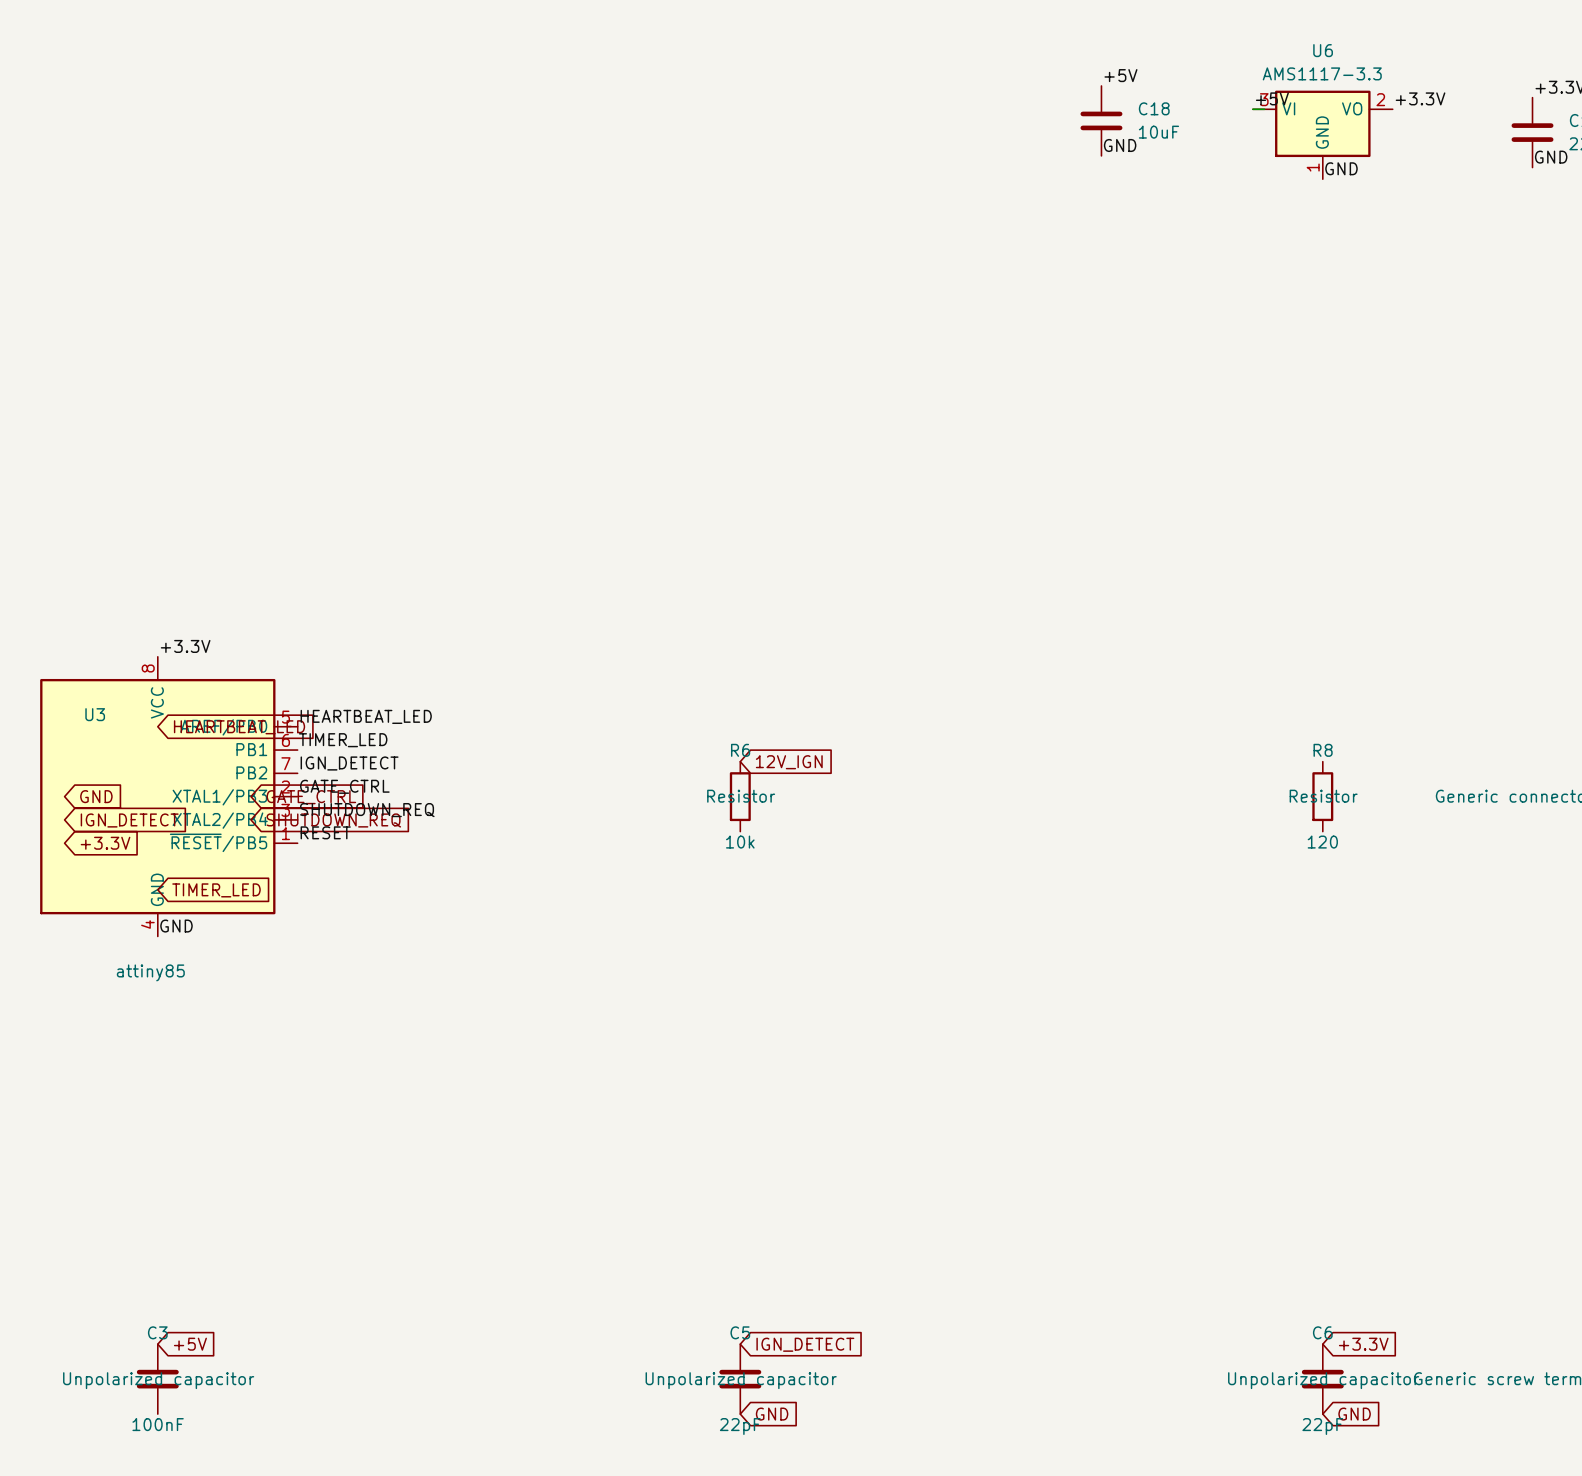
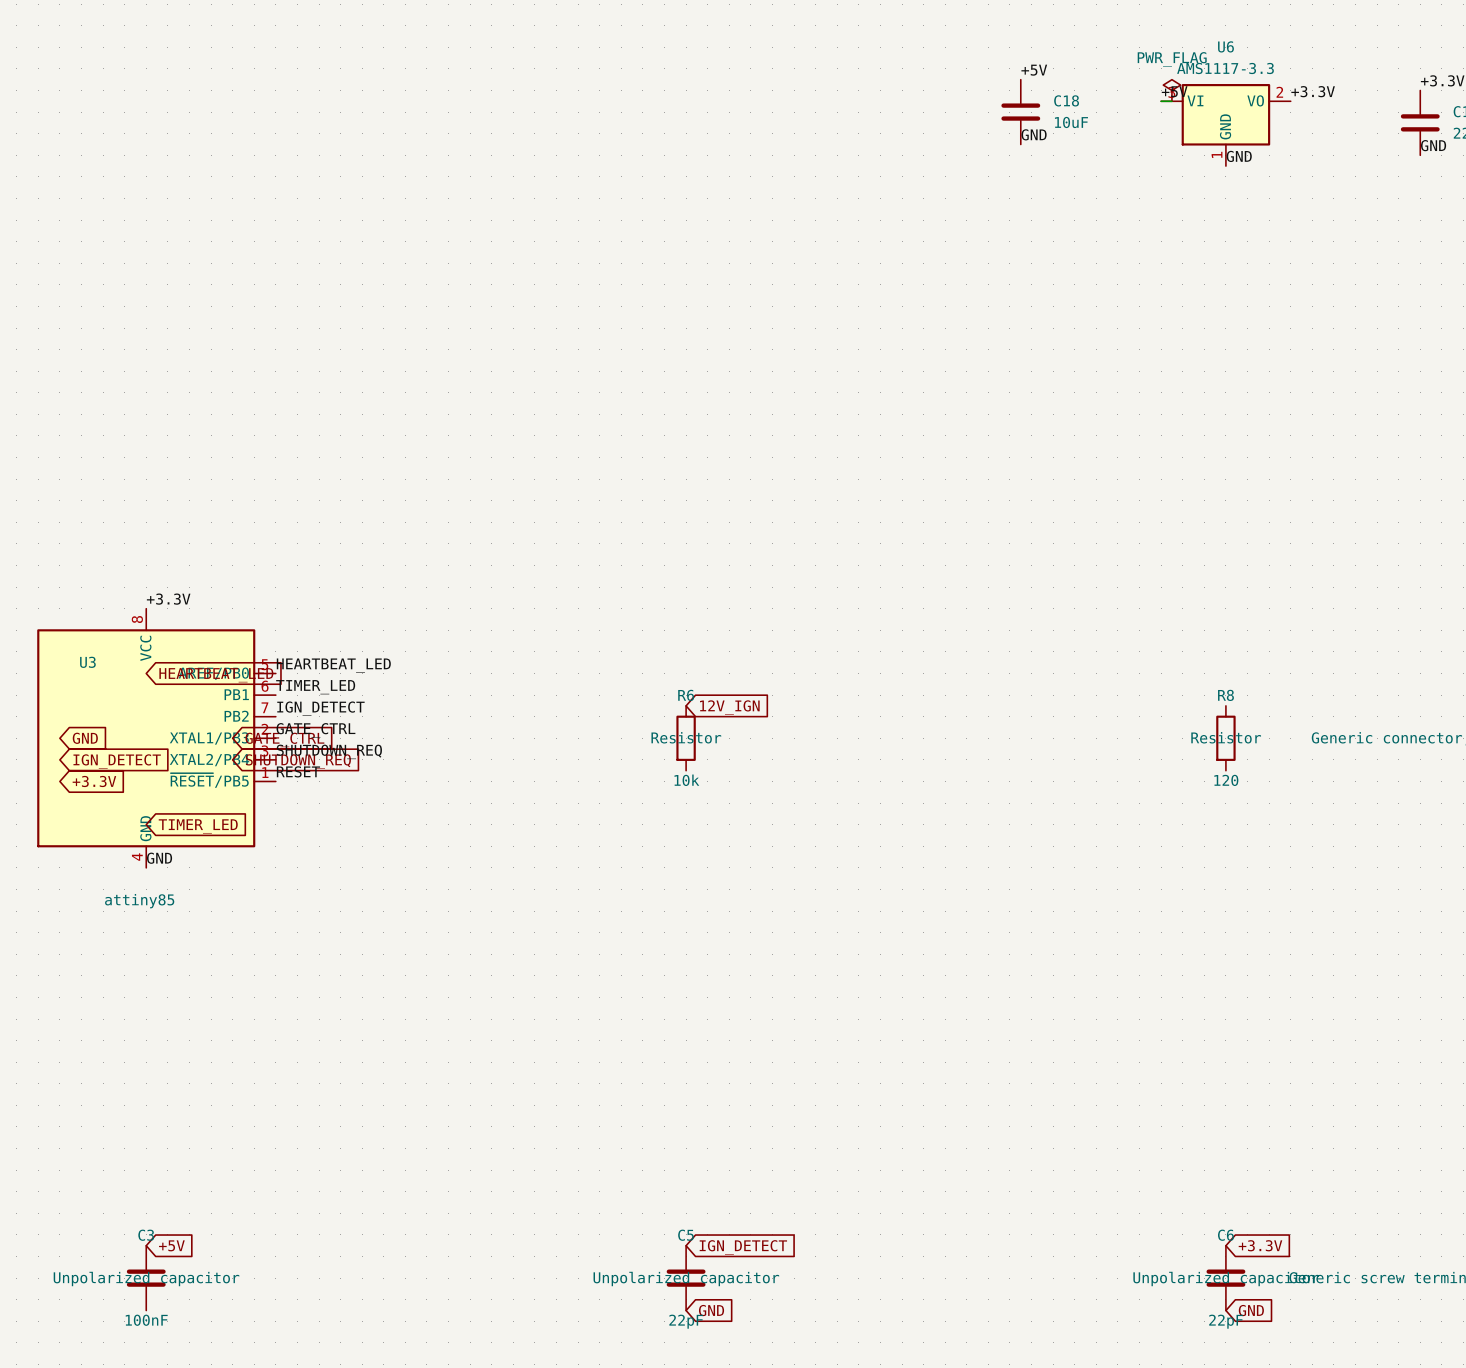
power symbol: none -> PWR_FLAG (1171, 90)

